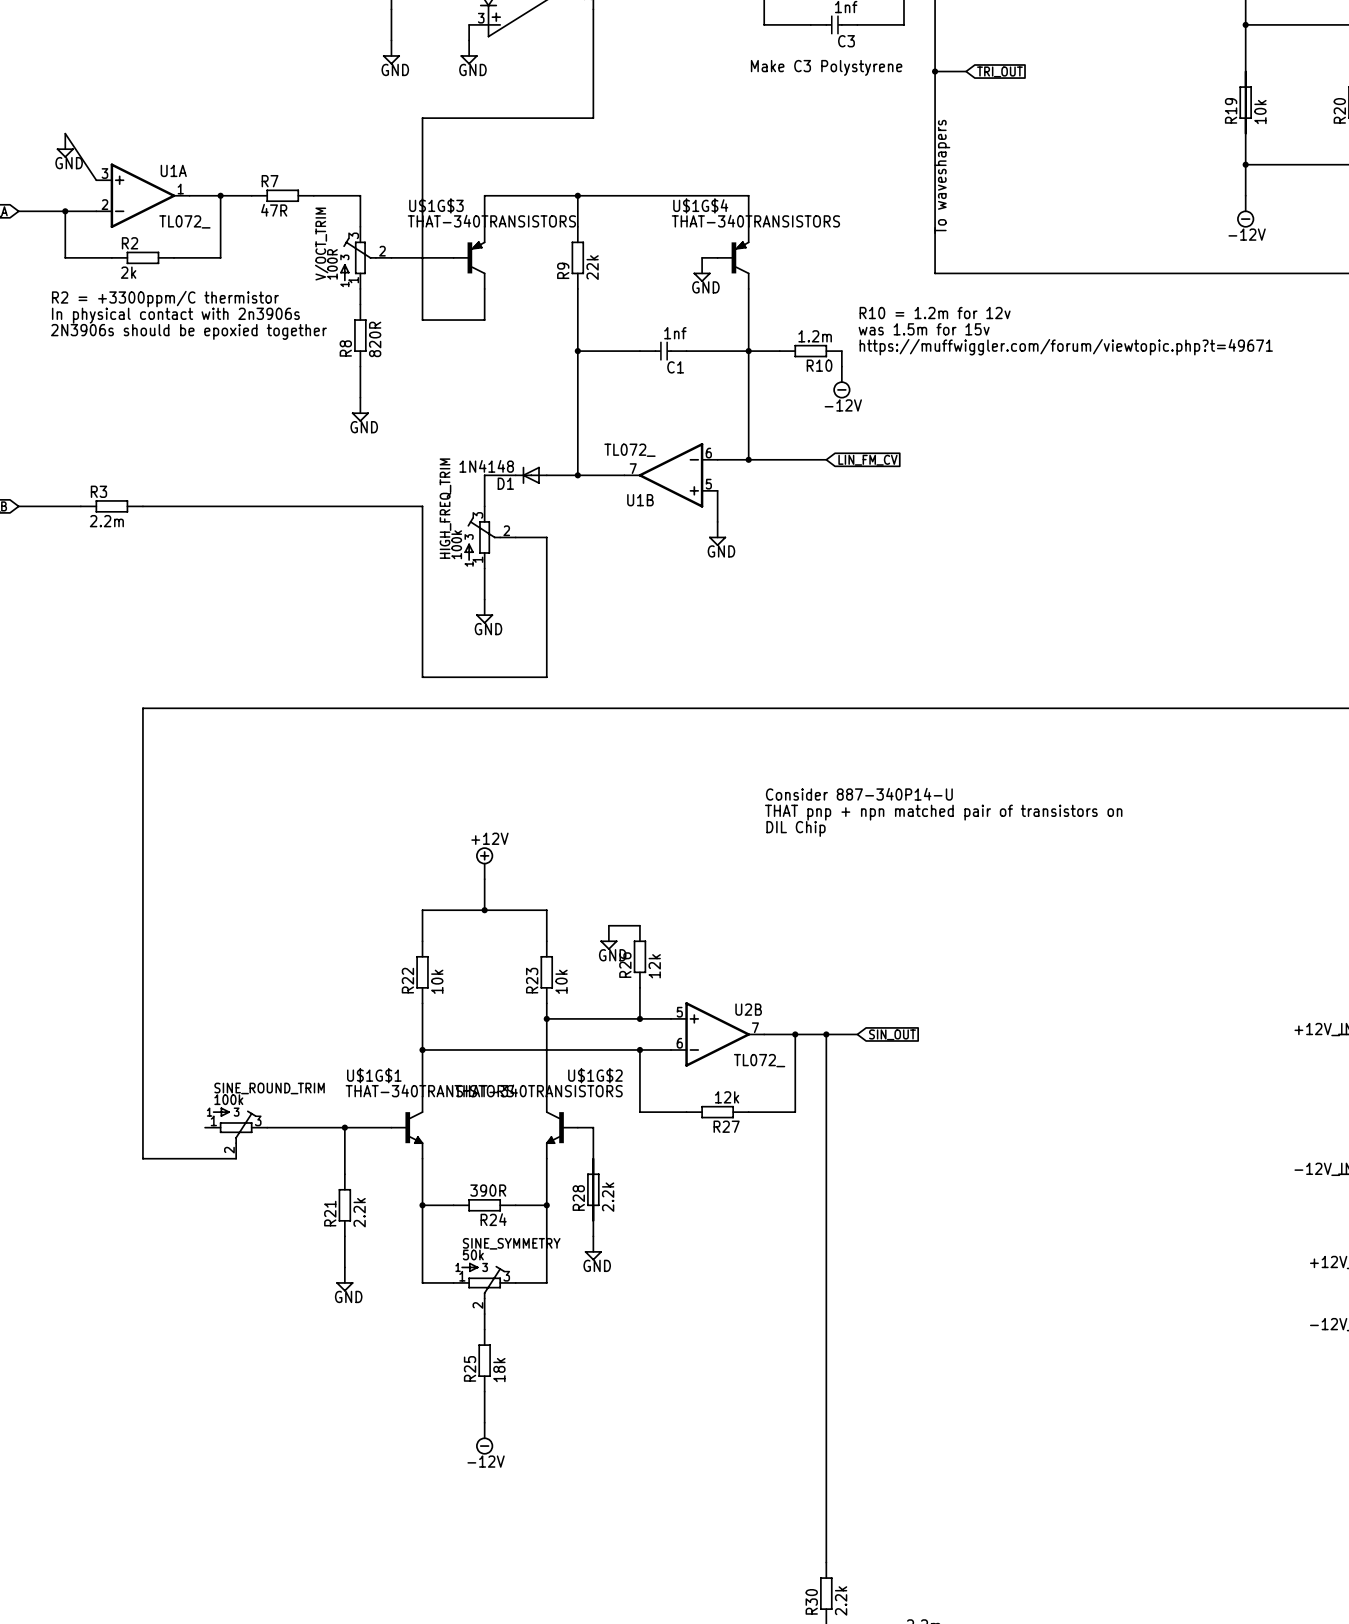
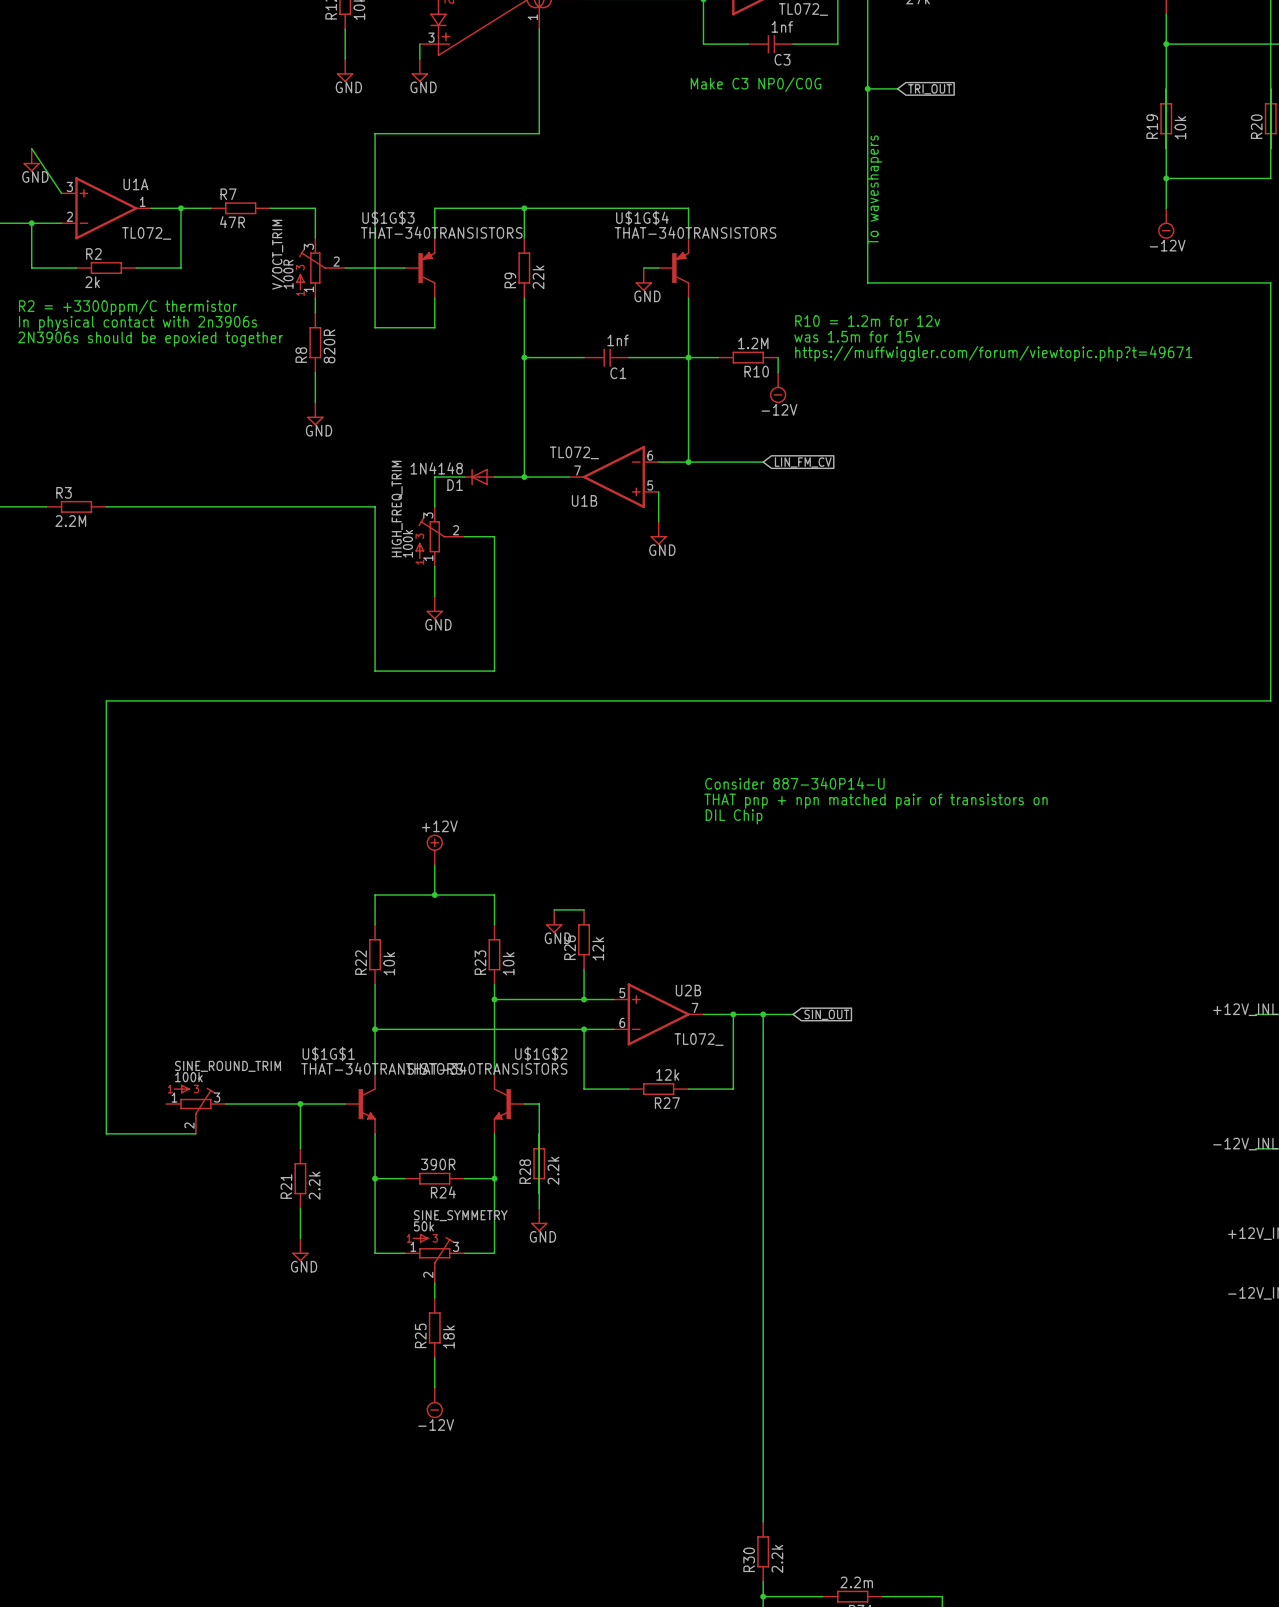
text: Make C3 Polystyrene (826, 67) -> Make C3 NP0/C0G (756, 84)
R10 value: 1.2m (815, 336) -> 1.2M (753, 343)
R3 value: 2.2m (106, 521) -> 2.2M (70, 521)

